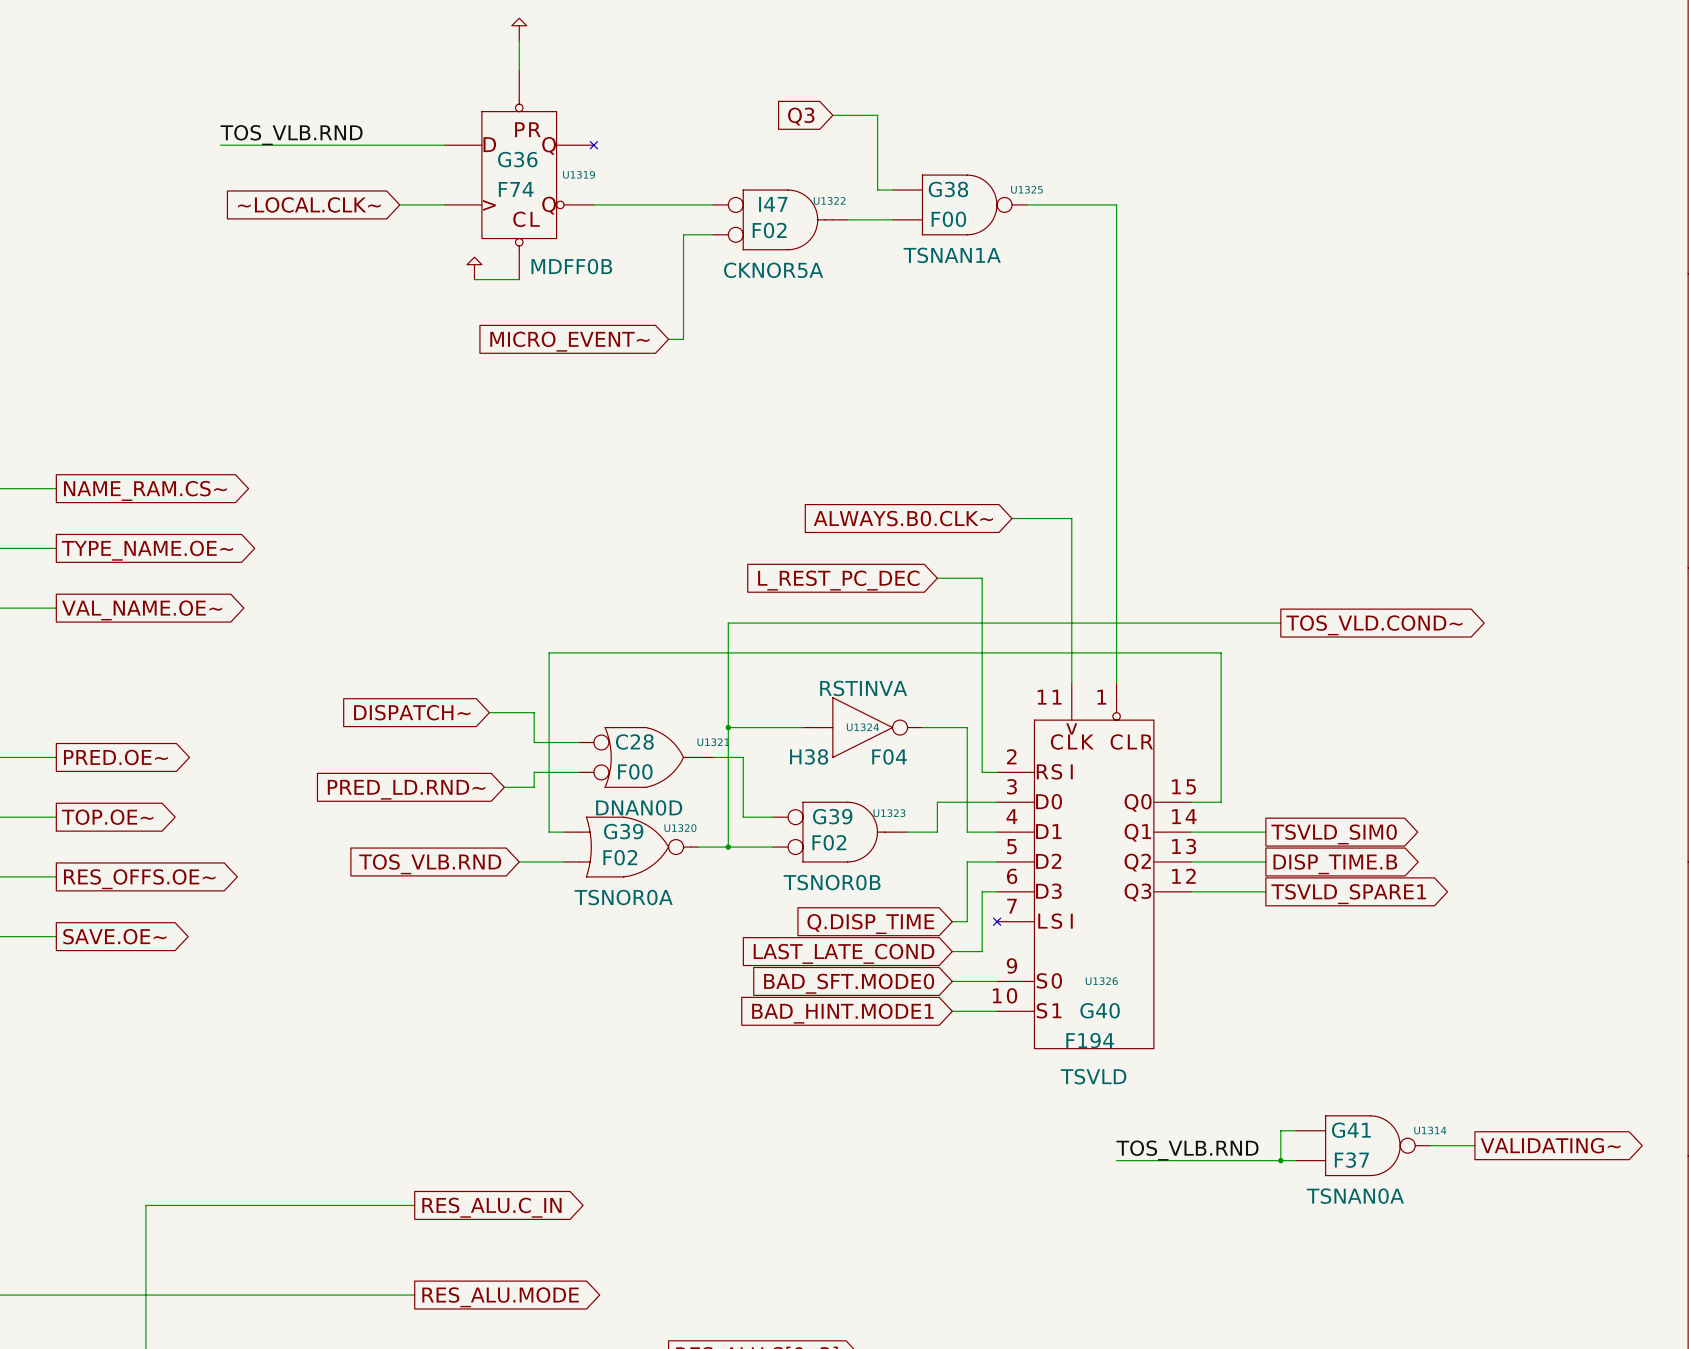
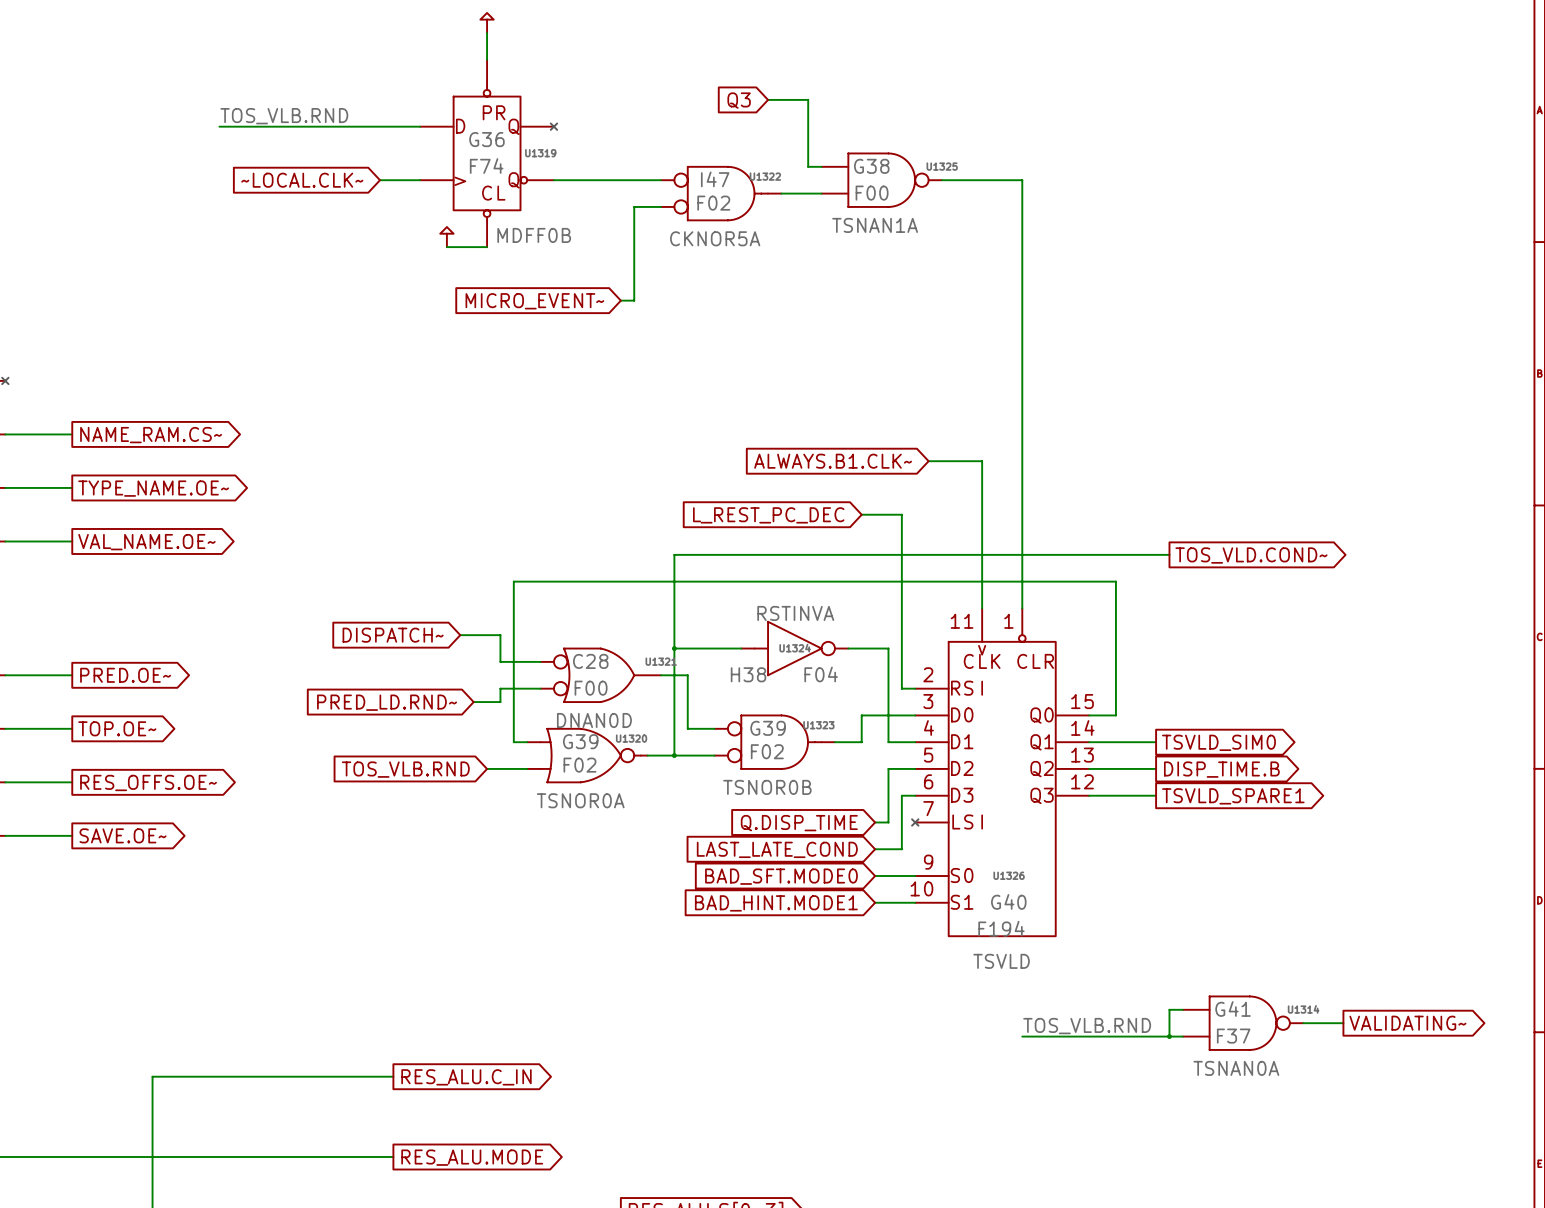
global label: ALWAYS.B0.CLK~ (903, 518) -> ALWAYS.B1.CLK~ (833, 461)

